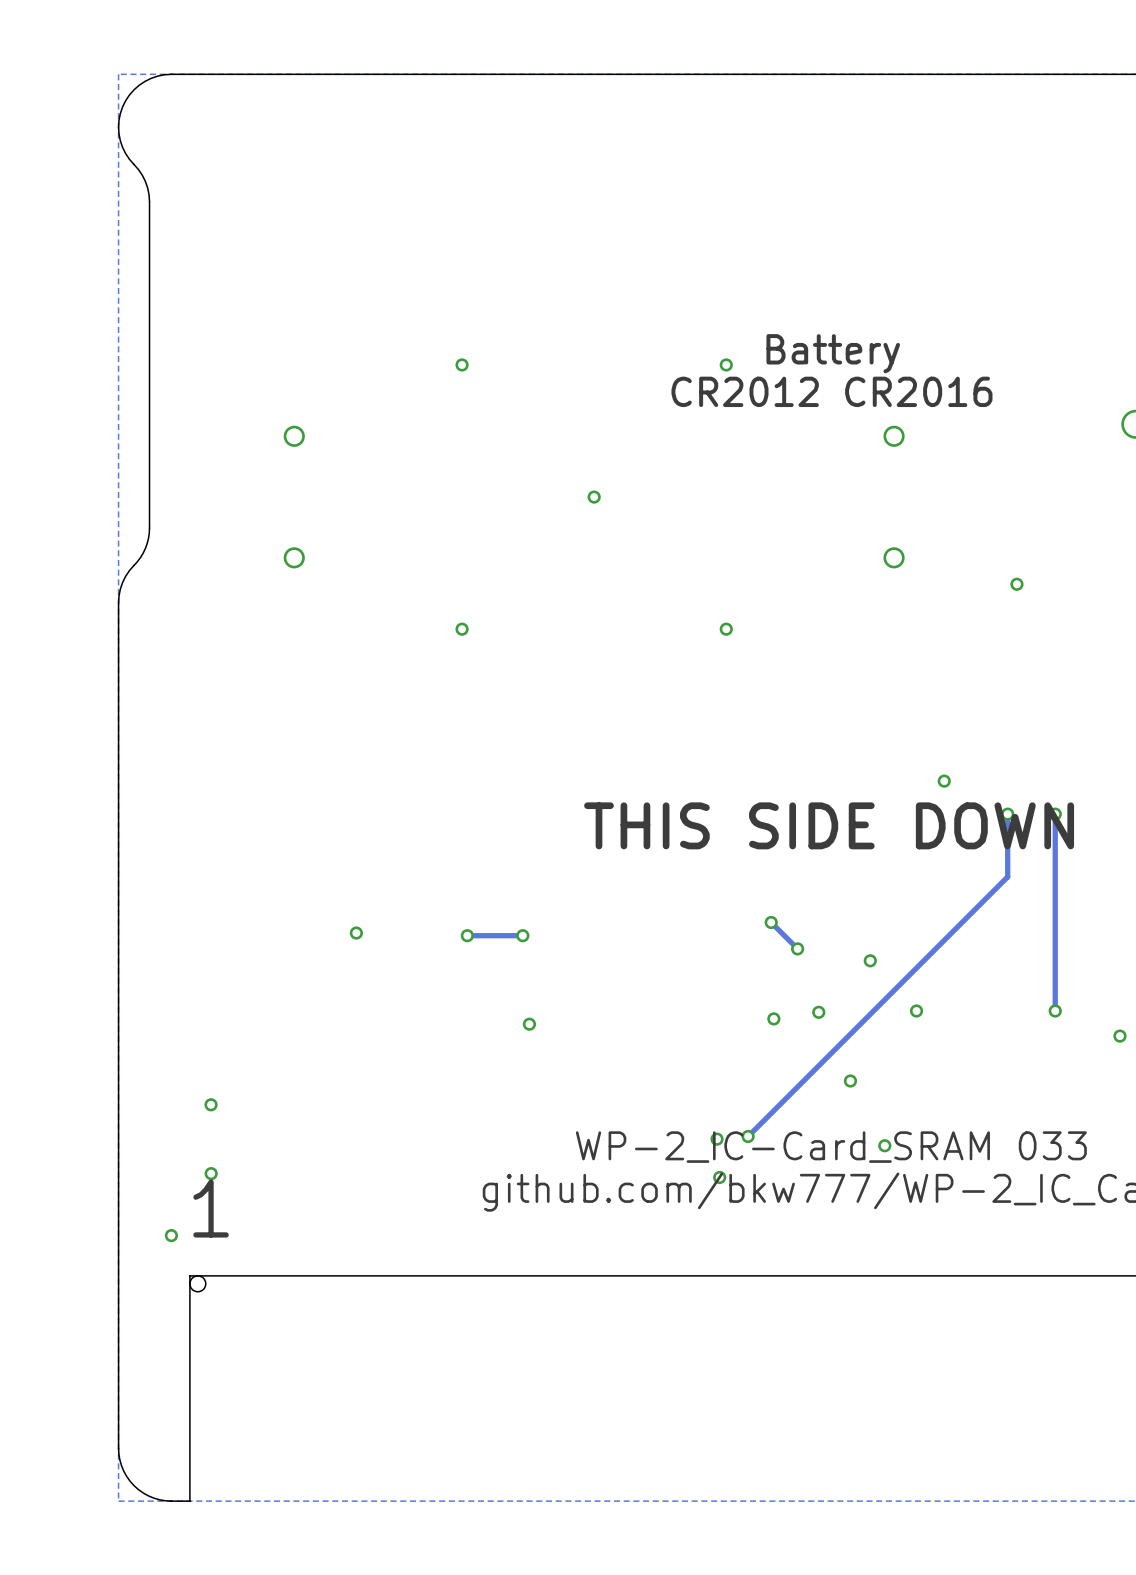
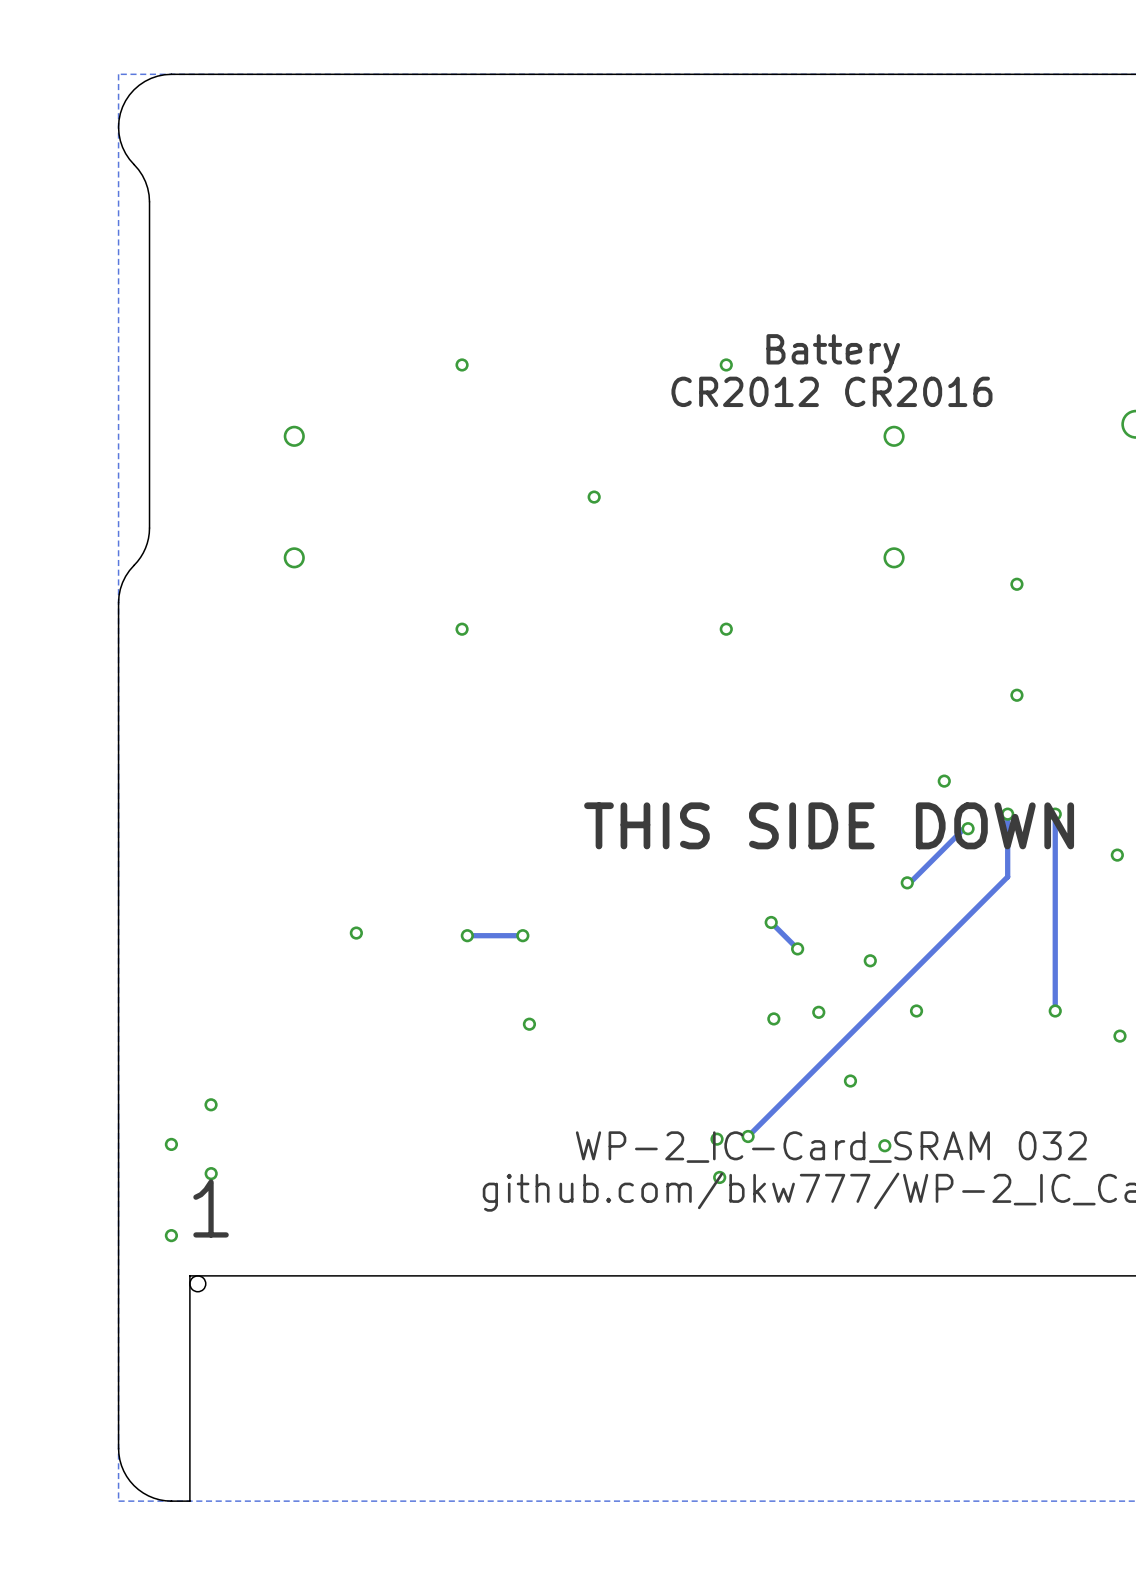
via: none -> (1016, 695)
track: none -> (968, 828) (964, 828) (909, 882) (907, 882)
via: none -> (968, 828)
via: none -> (1117, 855)
via: none -> (907, 882)
via: none -> (171, 1144)
text: WP-2_IC-Card_SRAM 033 (831, 1147) -> WP-2_IC-Card_SRAM 032 (831, 1147)

